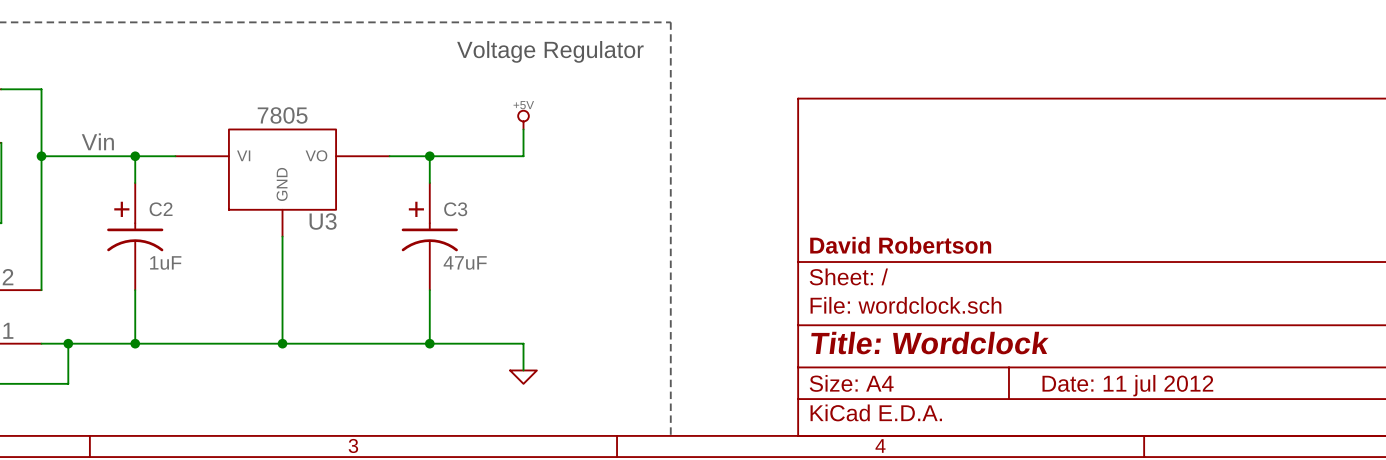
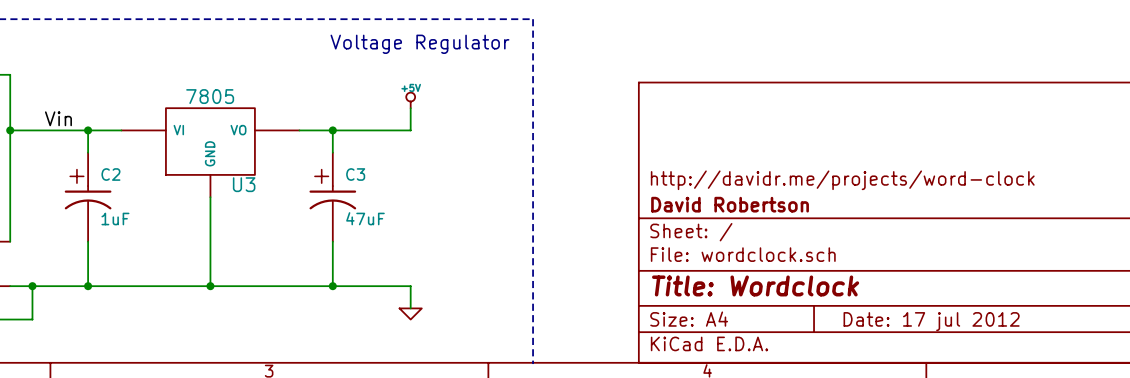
title block: none -> http://davidr.me/projects/word-clock (842, 180)
title block: Date: 11 jul 2012 (1127, 385) -> Date: 17 jul 2012 (931, 321)

